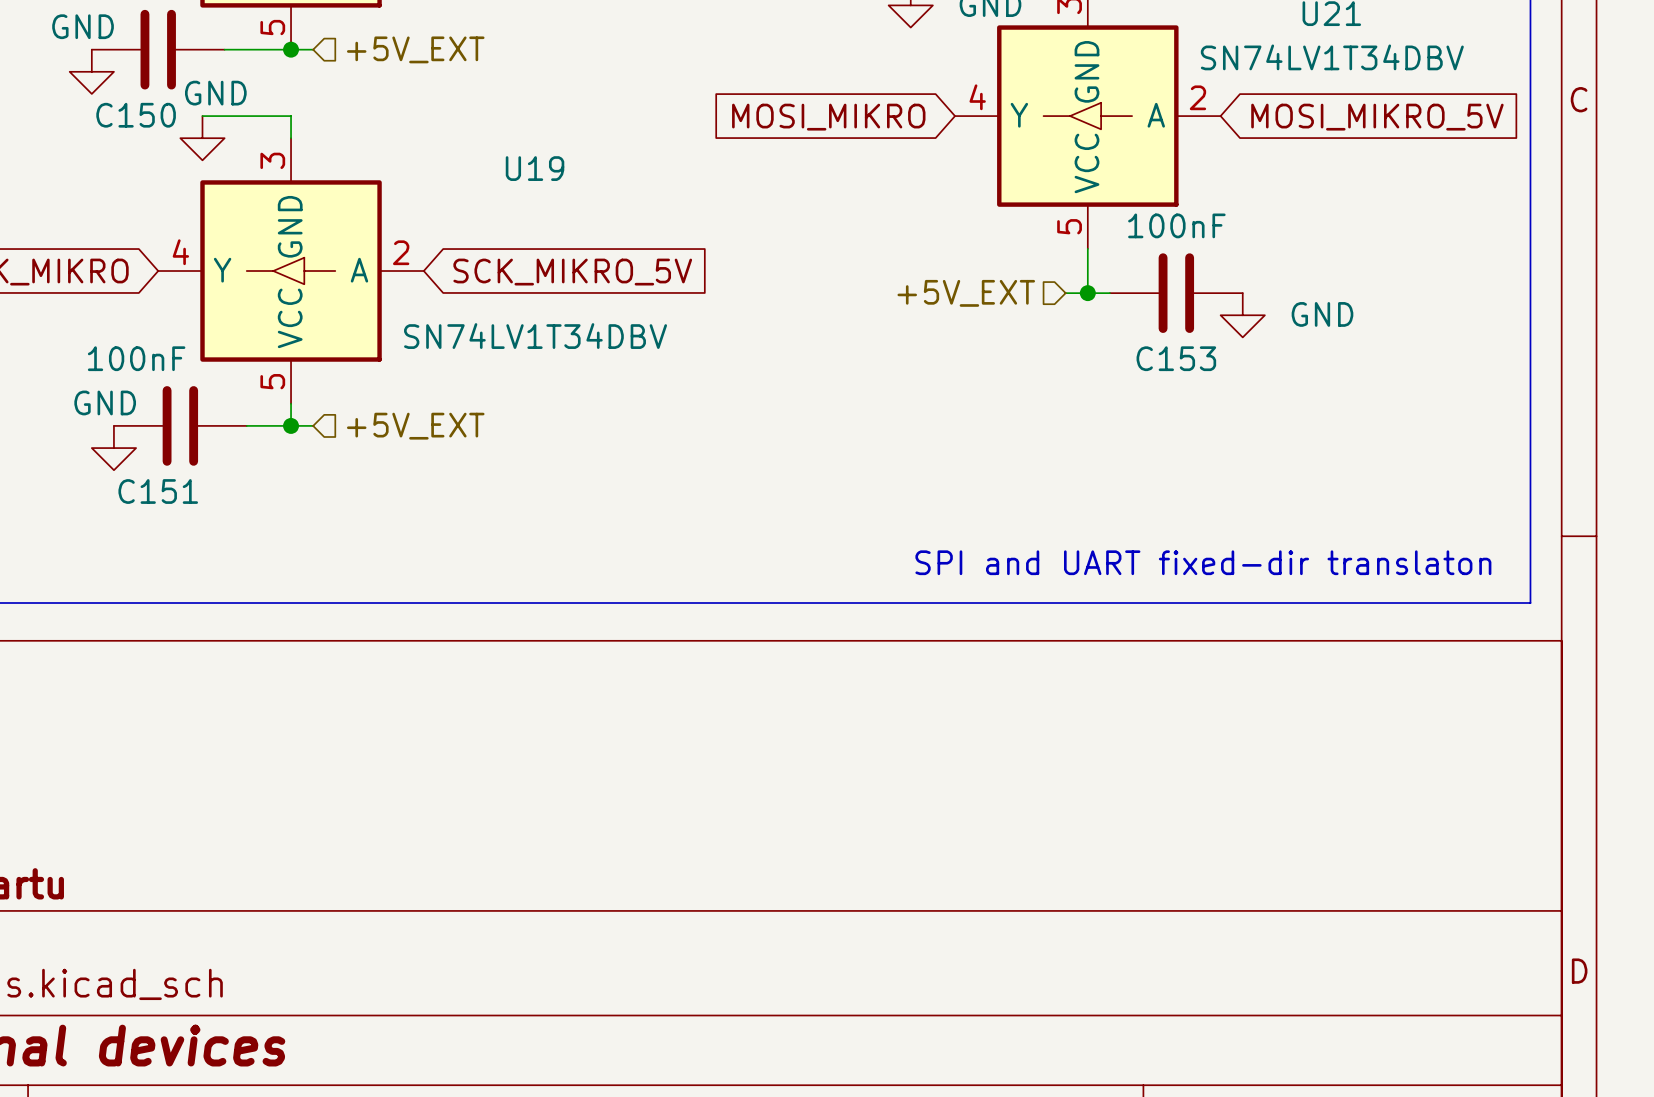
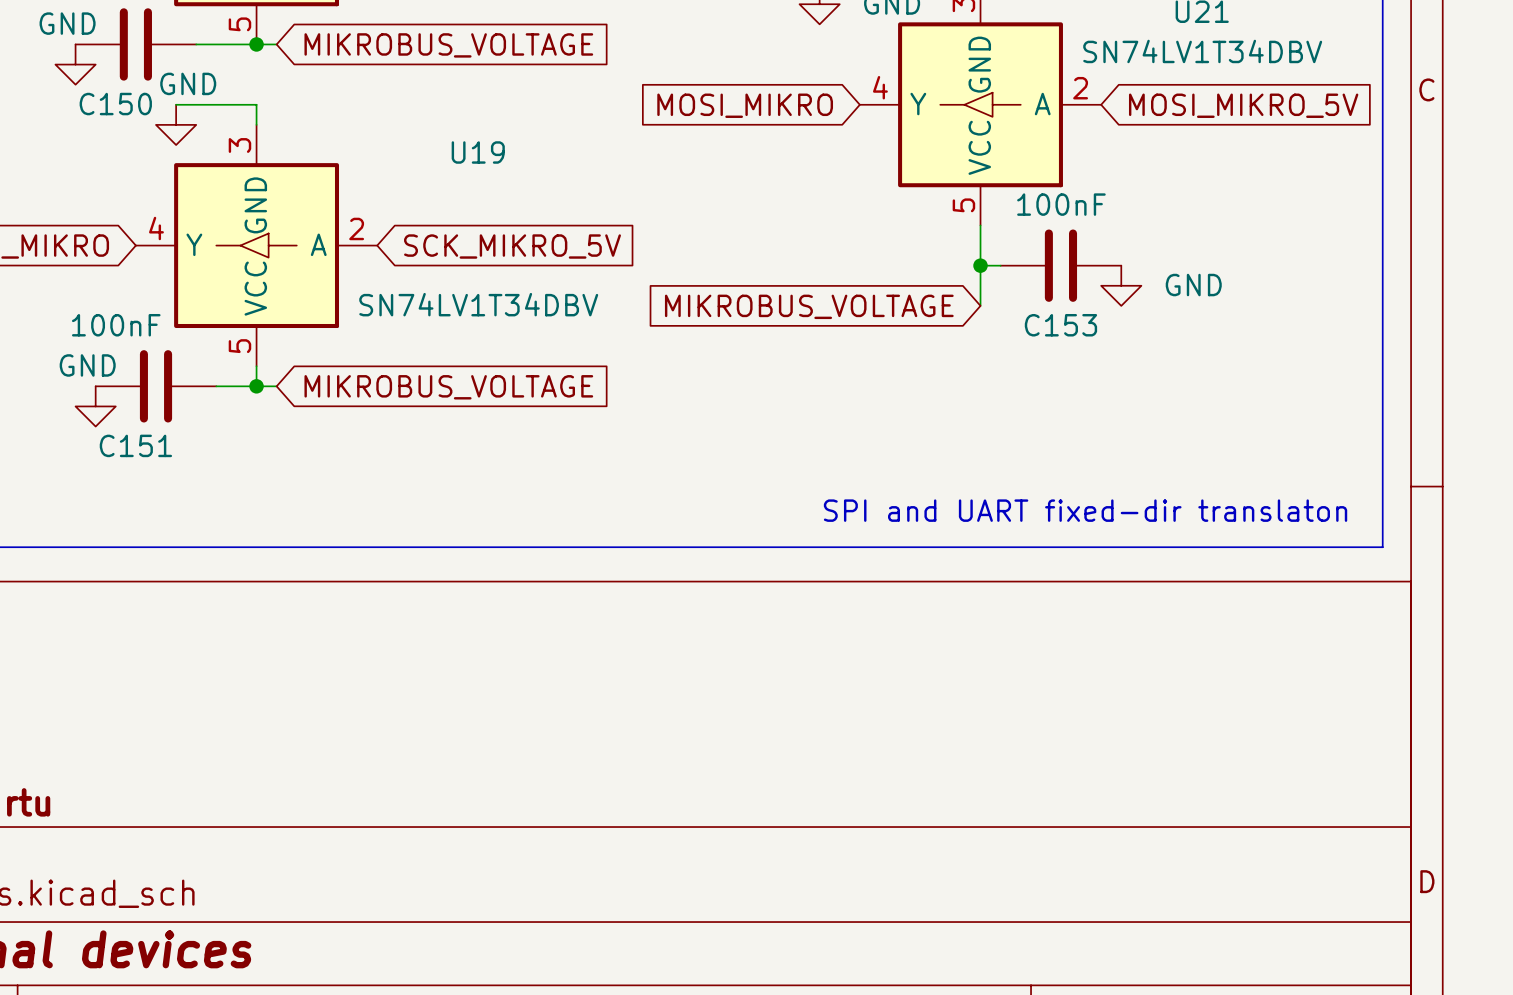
hierarchical label: +5V_EXT (415, 49) -> none
global label: none -> MIKROBUS_VOLTAGE (448, 45)
hierarchical label: +5V_EXT (966, 293) -> none
wire: (1065, 293) (1087, 293) -> (980, 305) (980, 265)
global label: none -> MIKROBUS_VOLTAGE (809, 306)
hierarchical label: +5V_EXT (415, 426) -> none
global label: none -> MIKROBUS_VOLTAGE (448, 387)

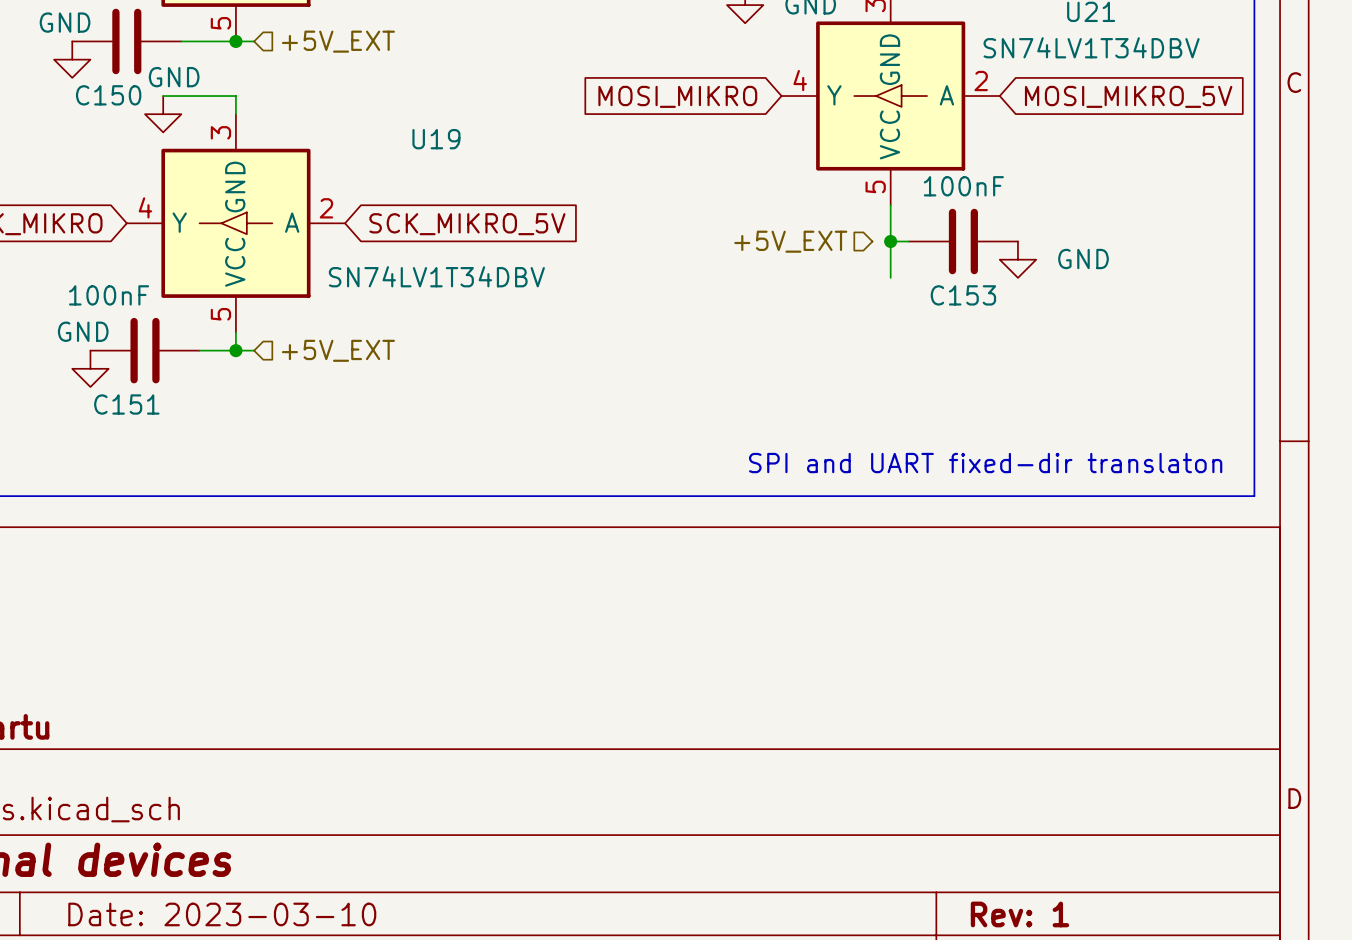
hierarchical label: none -> +5V_EXT (338, 41)
global label: MIKROBUS_VOLTAGE (448, 45) -> none
hierarchical label: none -> +5V_EXT (790, 241)
global label: MIKROBUS_VOLTAGE (809, 306) -> none
hierarchical label: none -> +5V_EXT (338, 350)
global label: MIKROBUS_VOLTAGE (448, 387) -> none

